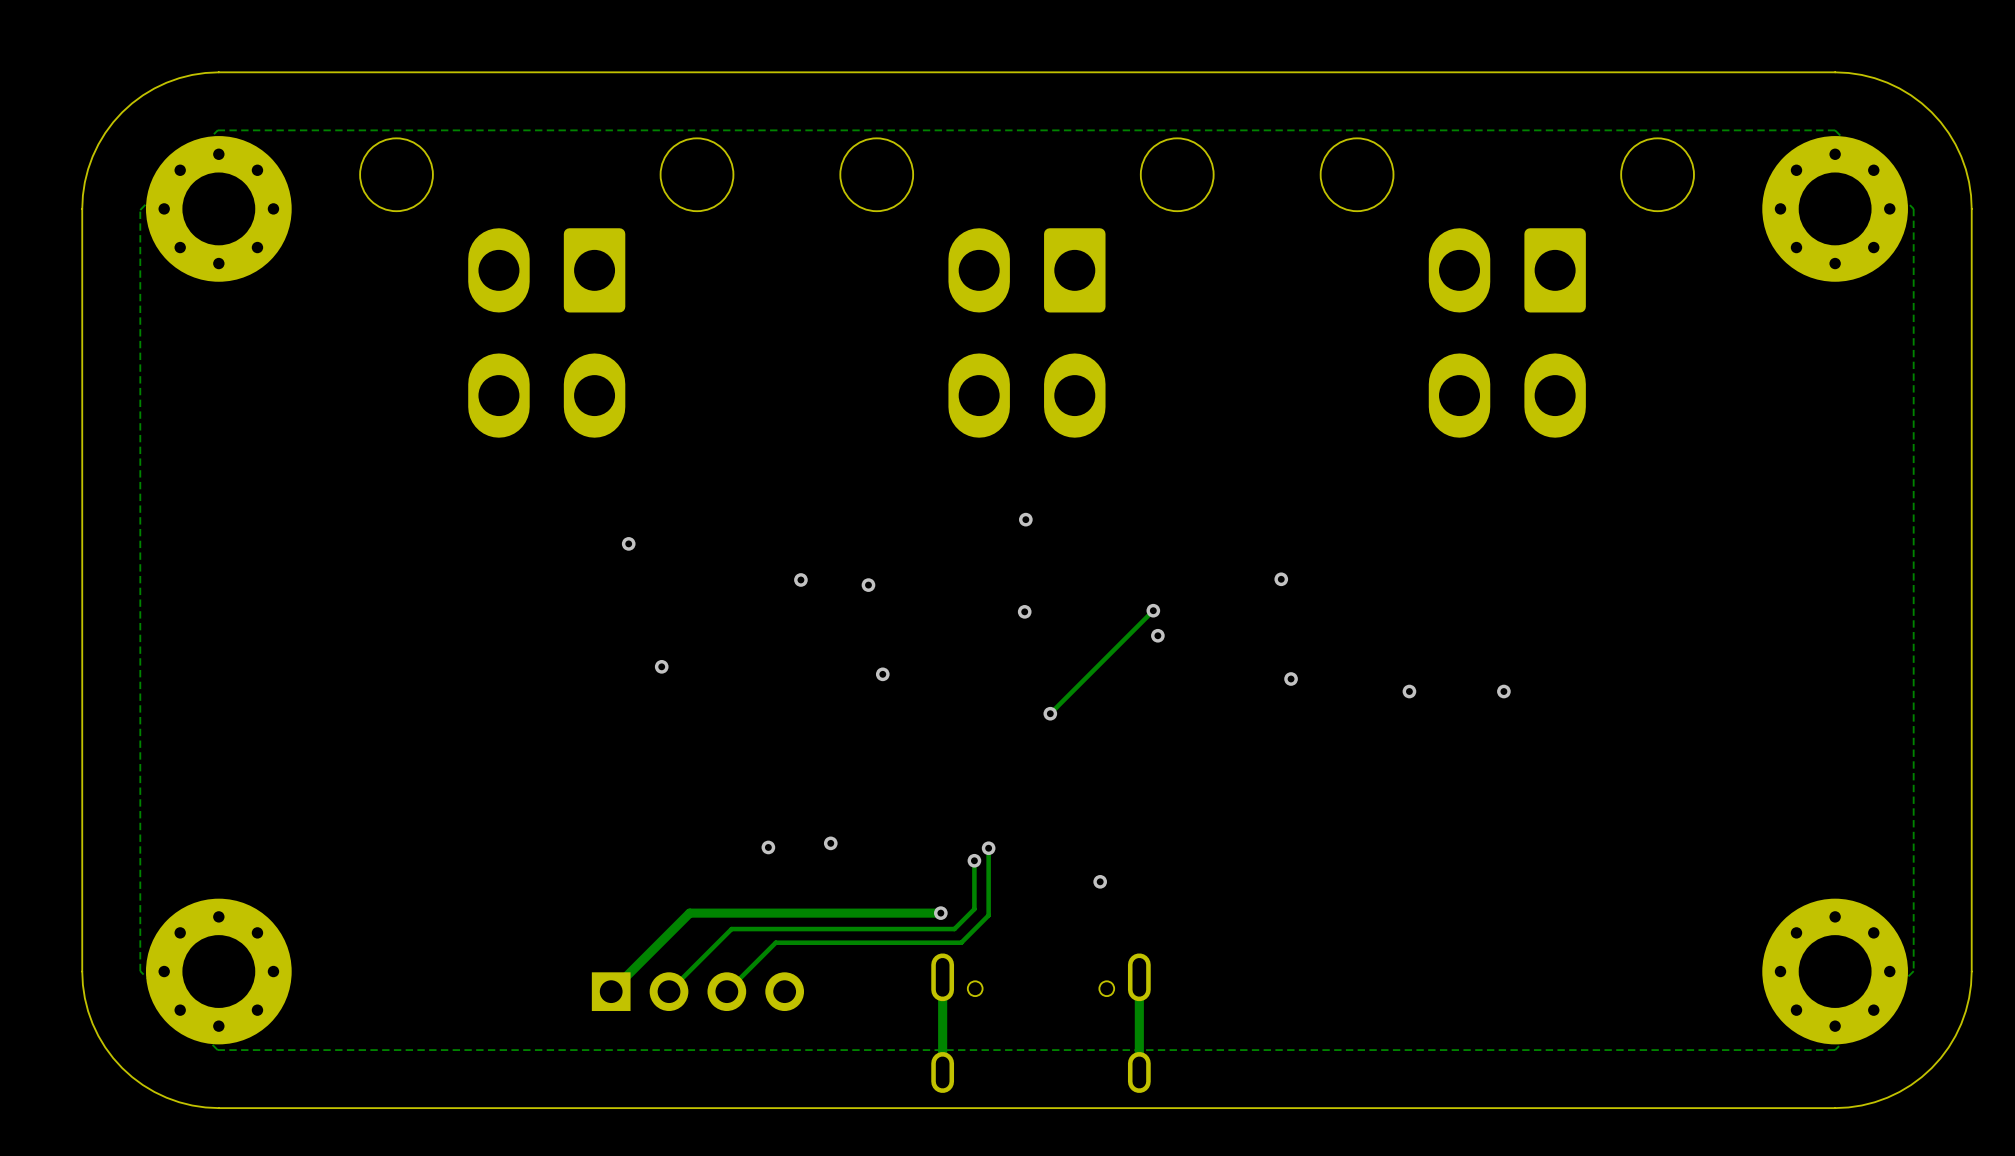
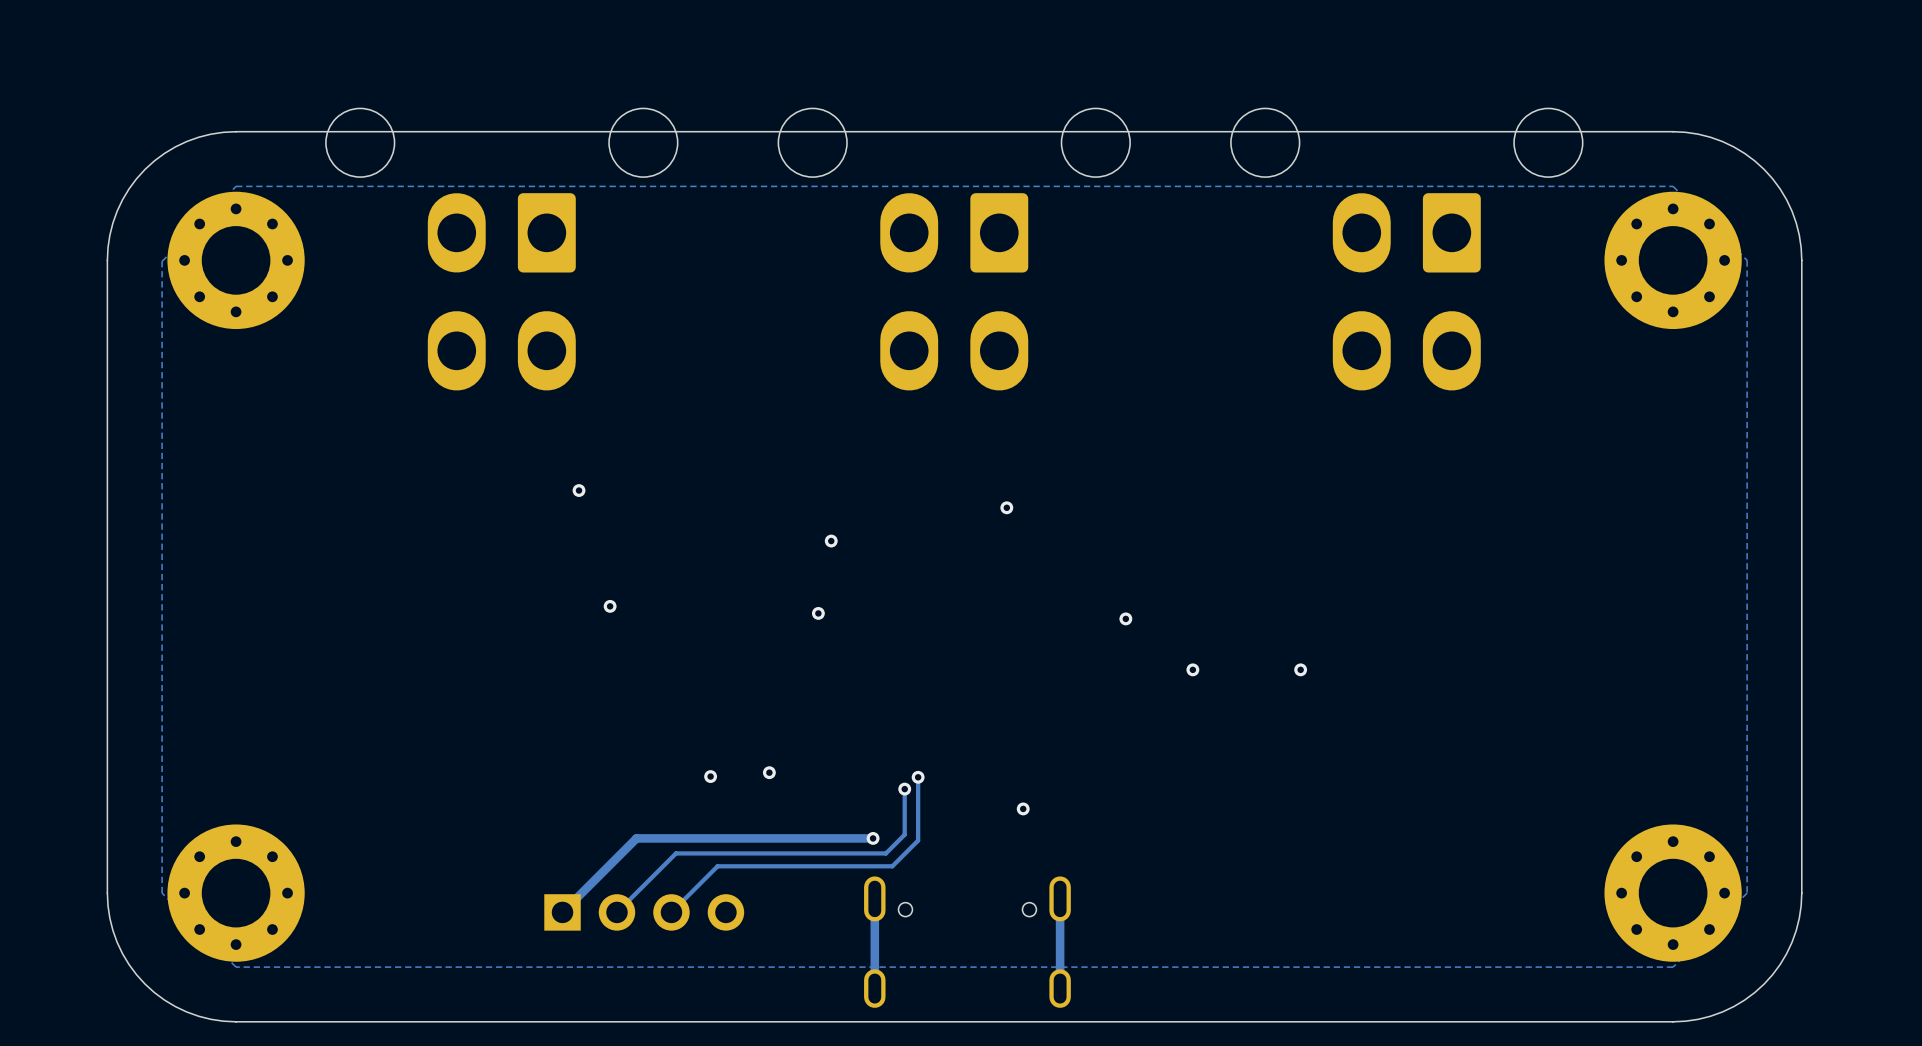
board edge: (1835, 72) (218, 72) (179, 78) (154, 88) (122, 112) (105, 133) (88, 169) (82, 195) (82, 971) (84, 998) (98, 1035) (122, 1068) (142, 1085) (179, 1102) (218, 1108) (1835, 1108) (1861, 1105) (1899, 1091) (1921, 1077) (1948, 1047) (1961, 1023) (1971, 984) (1971, 195) (1961, 156) (1948, 133) (1931, 112) (1911, 95) (1887, 82) (1861, 74) (1835, 72) -> (1673, 131) (1710, 137) (1733, 146) (1754, 160) (1772, 178) (1786, 199) (1796, 223) (1801, 247) (1801, 905) (1796, 930) (1780, 964) (1754, 992) (1733, 1006) (1710, 1016) (1673, 1021) (236, 1021) (210, 1019) (175, 1006) (145, 984) (122, 953) (112, 930) (107, 893) (108, 247) (117, 211) (129, 188) (154, 160) (175, 146) (198, 137) (236, 131) (1673, 131)
zone outline: (1835, 130) (217, 130) (140, 210) (140, 971) (217, 1050) (1835, 1050) (1913, 971) (1913, 208) (1835, 130) -> (1673, 186) (1747, 260) (1747, 893) (1673, 967) (236, 967) (162, 893) (162, 261) (236, 186) (1673, 186)
part position: (218, 208) -> (236, 260)
part position: (1835, 208) -> (1673, 260)
via: (1025, 519) -> none
via: none -> (1006, 507)
via: (800, 579) -> none
via: (1281, 579) -> none
via position: (868, 585) -> (831, 541)
track: (1153, 610) (1050, 713) -> none
via: (1153, 610) -> none
via: (1024, 611) -> none
via: (1157, 635) -> none
via: (1291, 679) -> none
via: none -> (1125, 618)
via position: (1409, 691) -> (1300, 669)
via: (1503, 691) -> none
via: (1050, 713) -> none
via: none -> (1192, 669)
part position: (218, 971) -> (236, 893)
part position: (1835, 971) -> (1673, 893)

